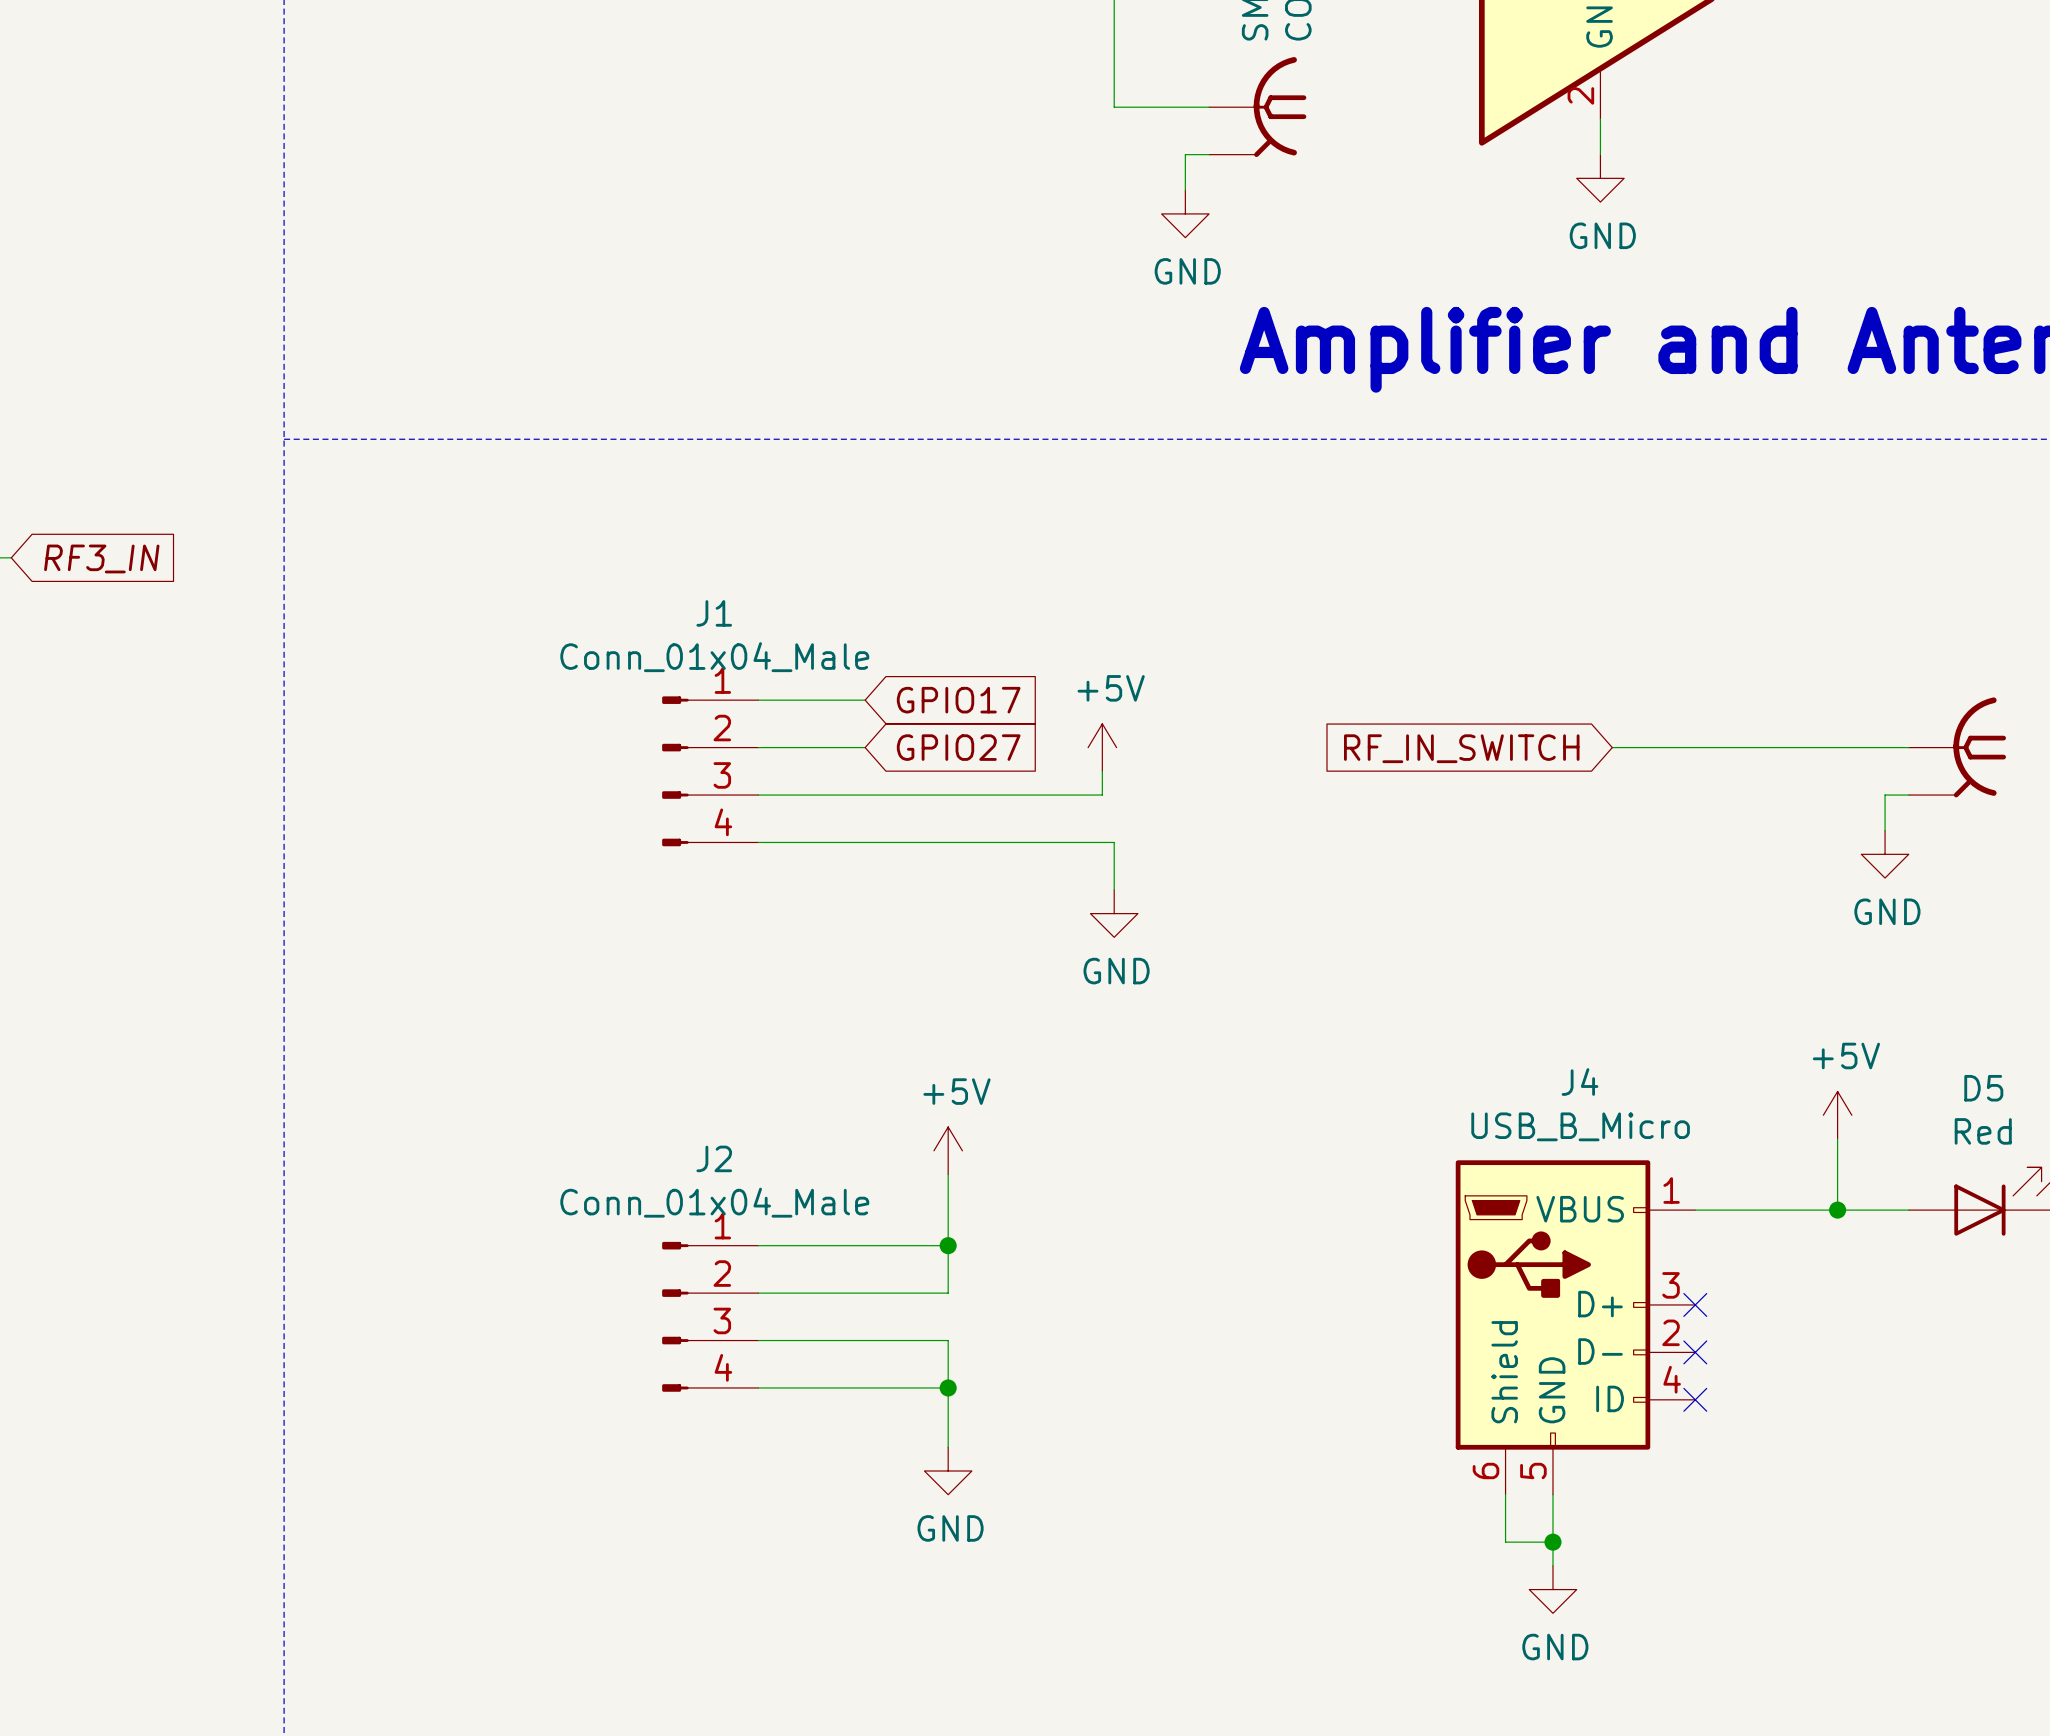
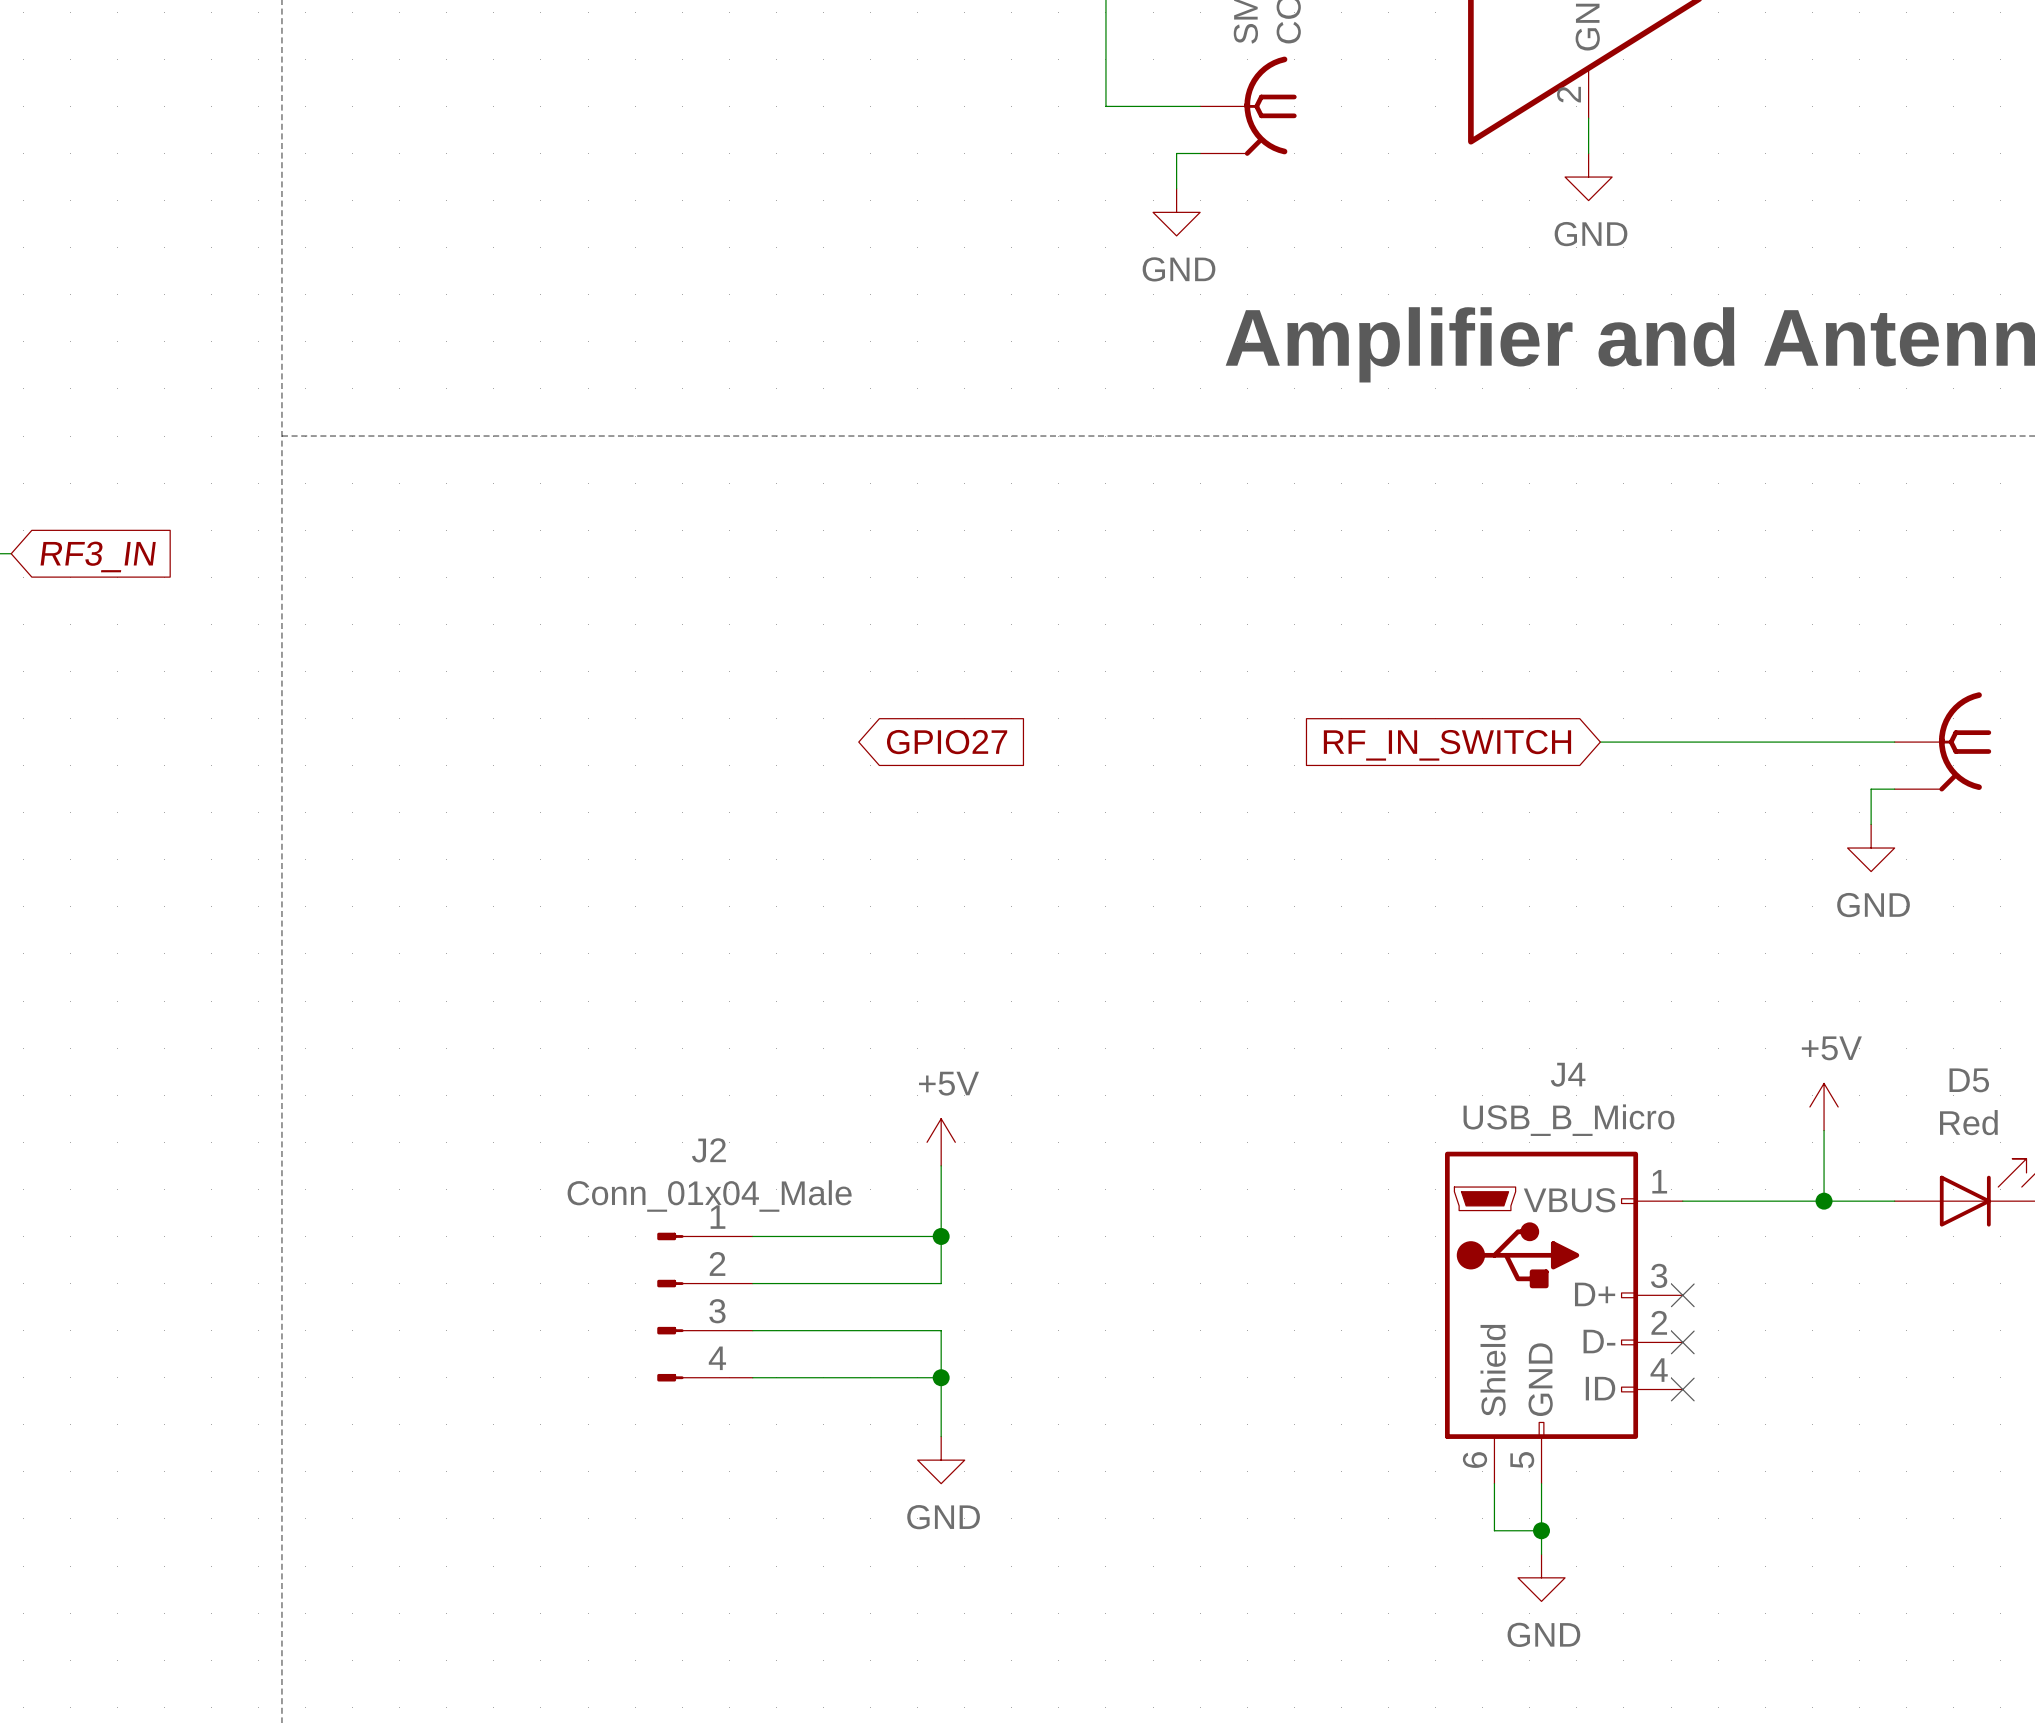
wire: (758, 700) (865, 700) -> none
global label: GPIO17 (958, 700) -> none
wire: (758, 747) (865, 747) -> none
power symbol: +5V (1102, 747) -> none
J1: Conn_01x04_Male (710, 771) -> none
wire: (1102, 771) (1102, 795) (758, 795) -> none
wire: (758, 842) (1114, 842) (1114, 889) -> none
power symbol: GND (1114, 913) -> none

